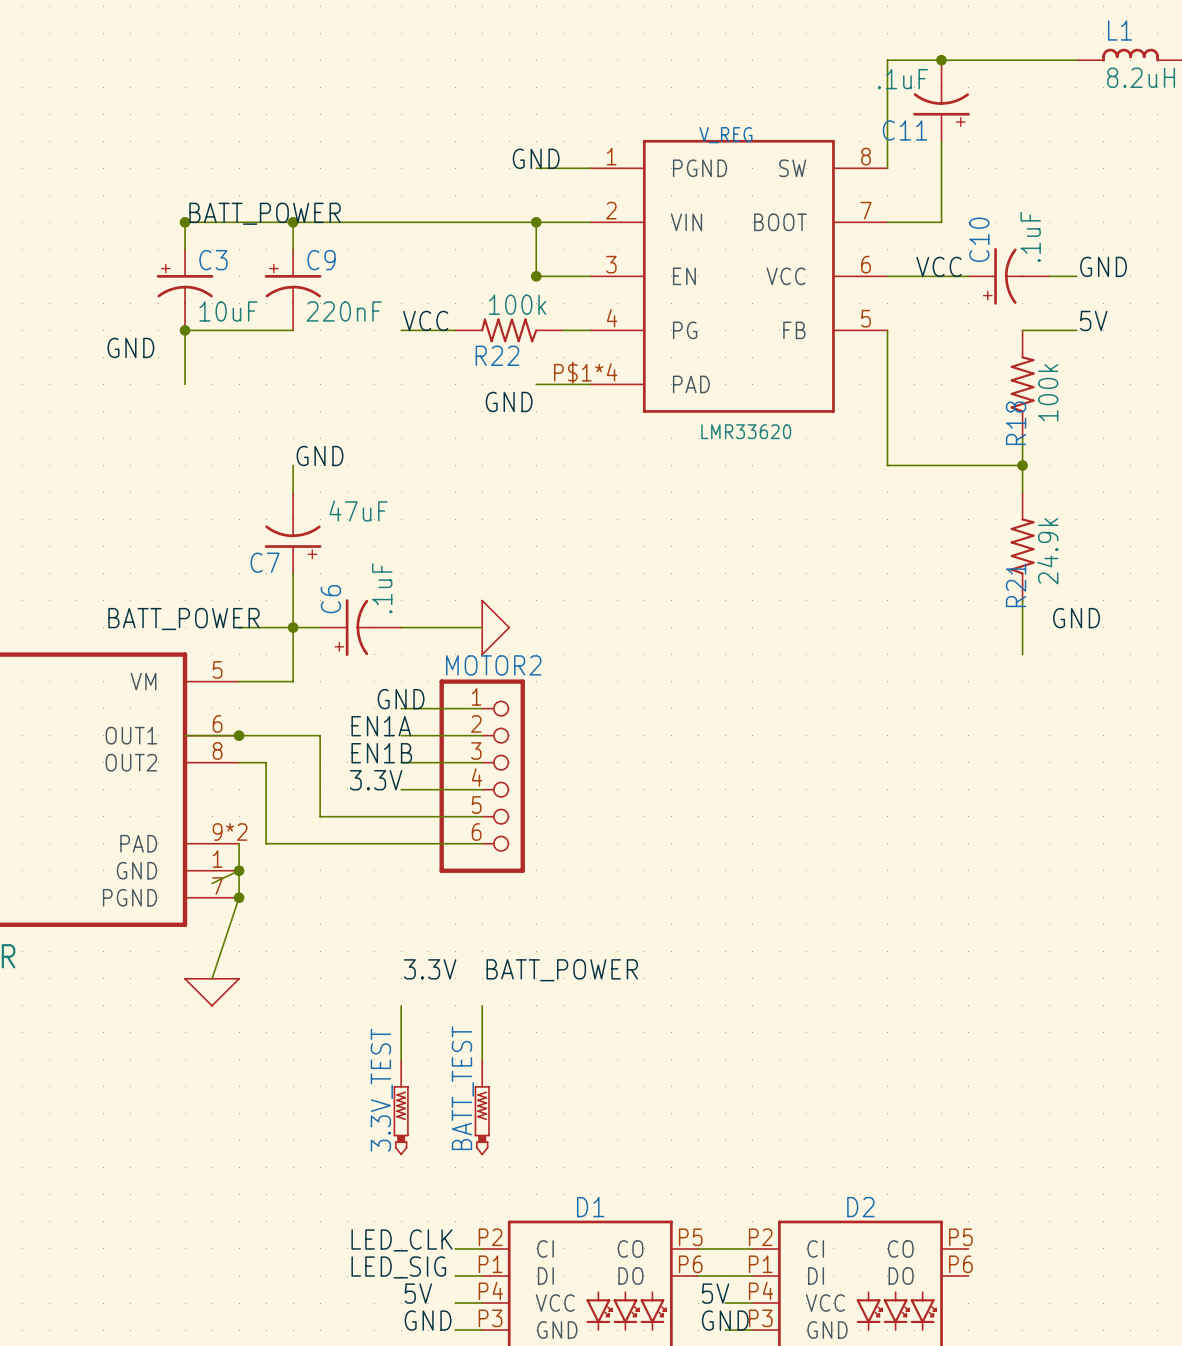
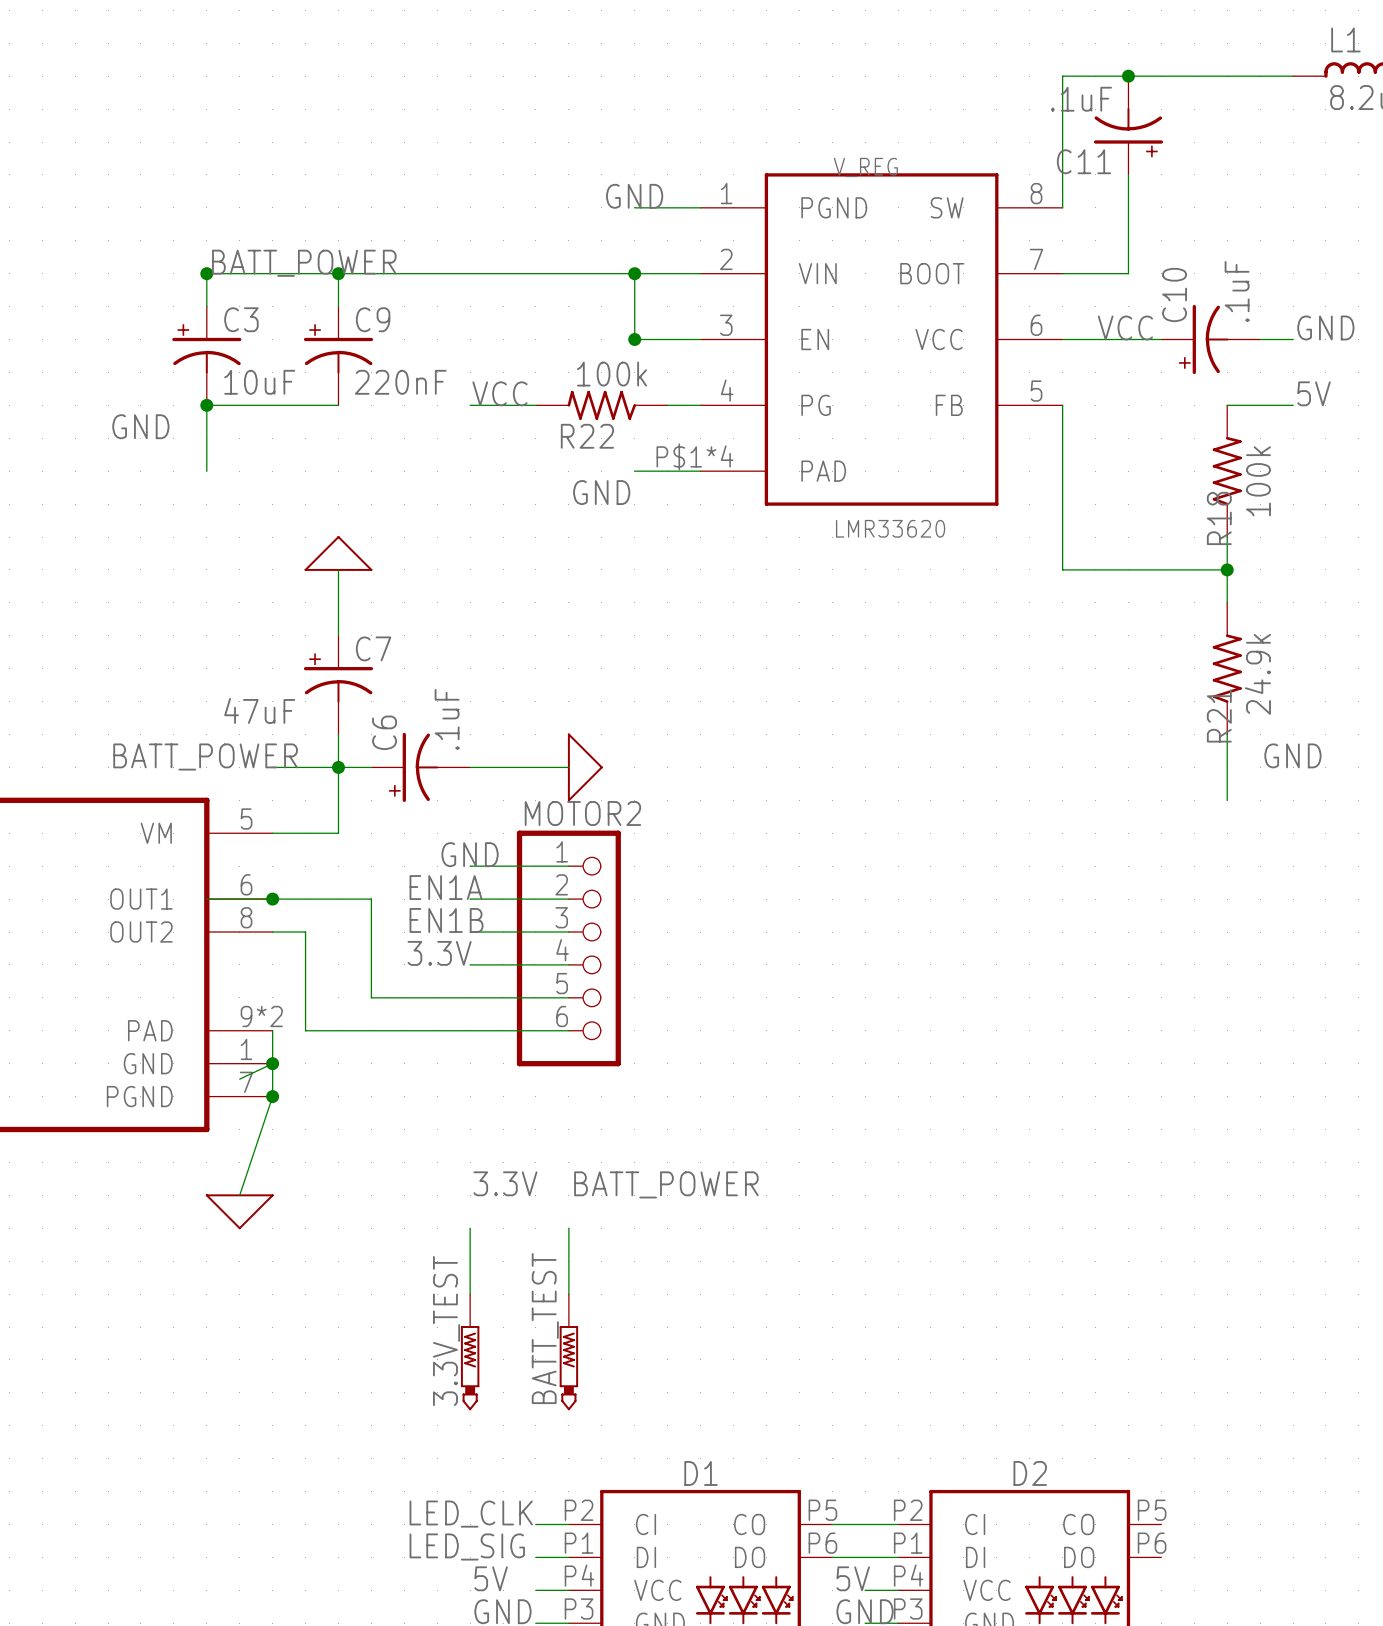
power symbol: none -> (338, 553)
label: GND (320, 456) -> none
C7 rotation: 0° (293, 538) -> 180° (338, 678)

